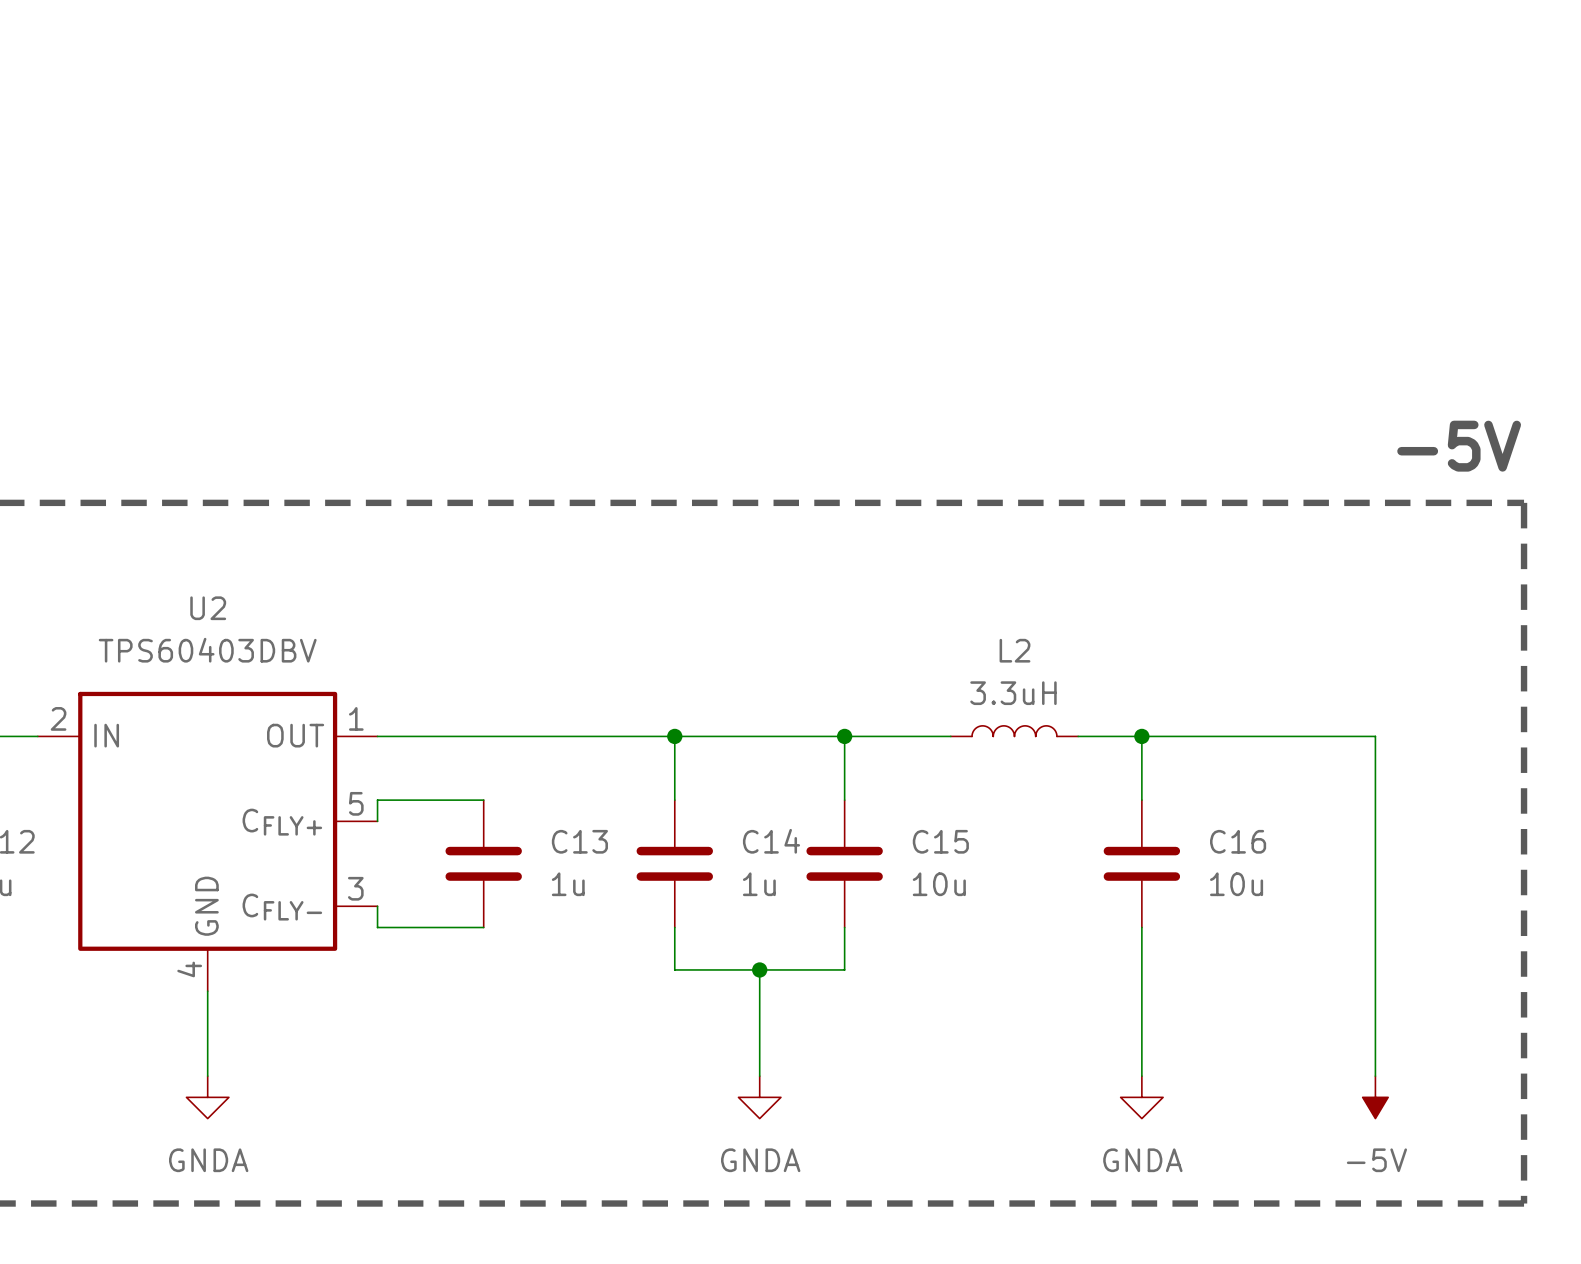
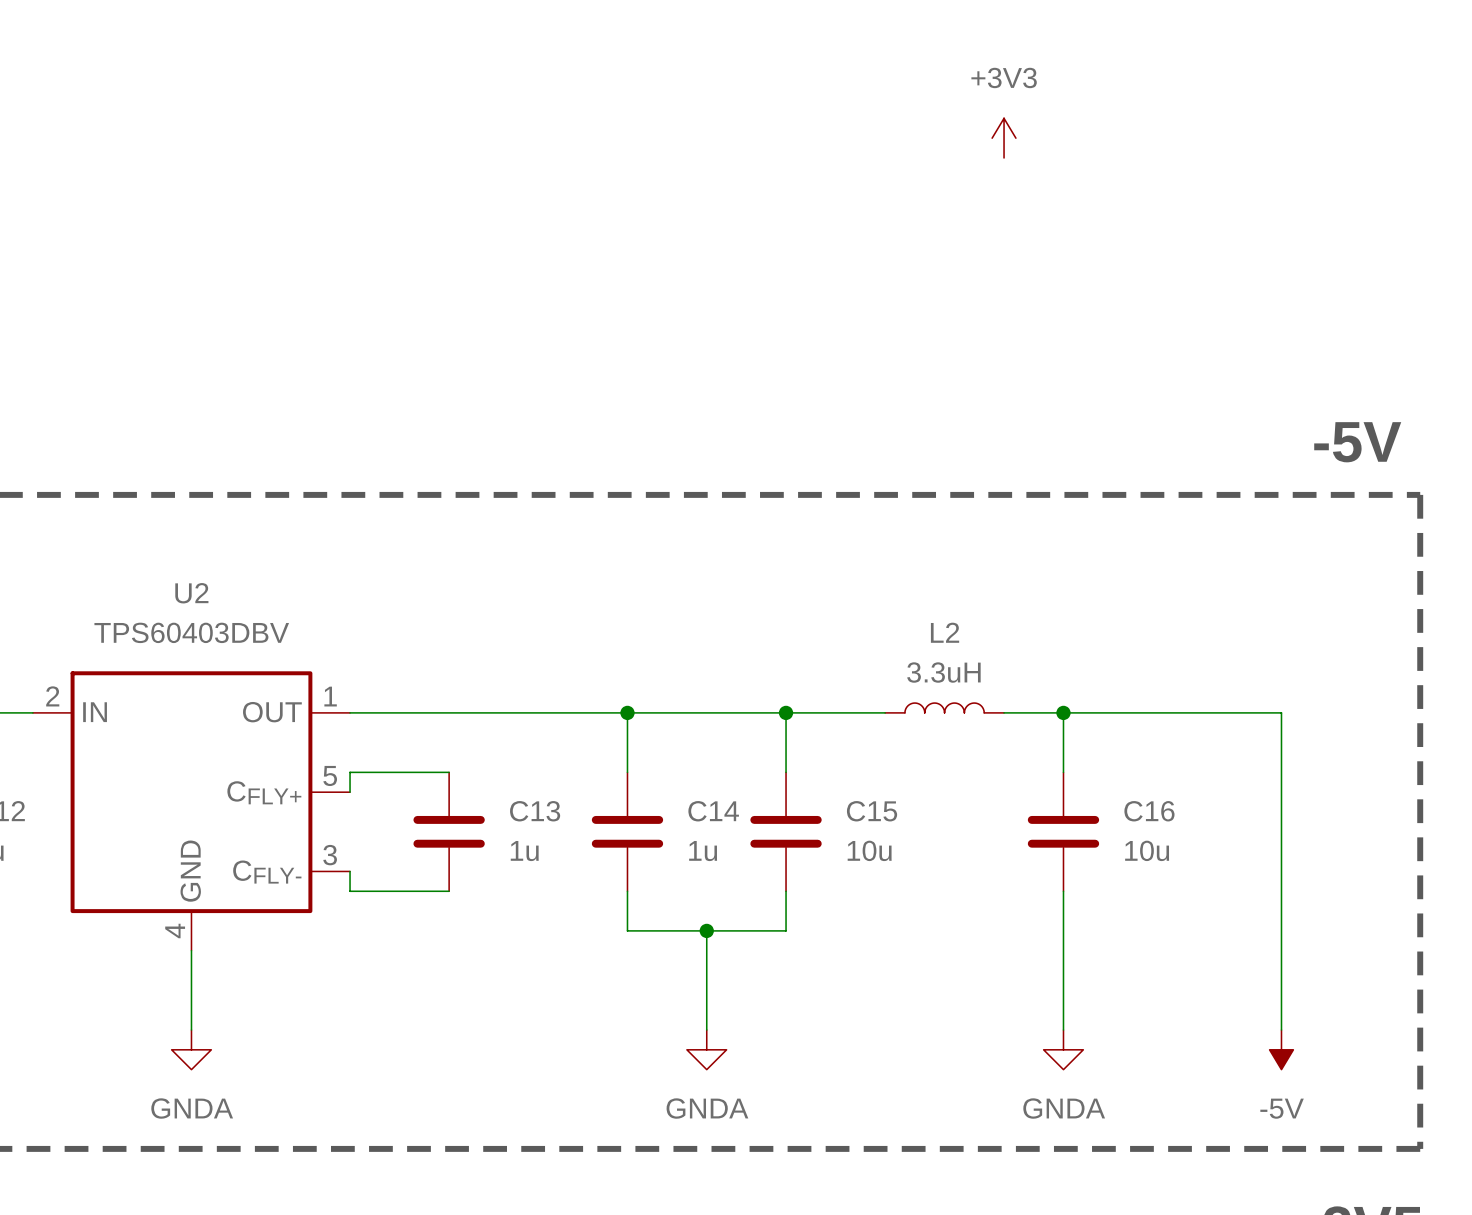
power symbol: none -> +3V3 (1004, 138)

